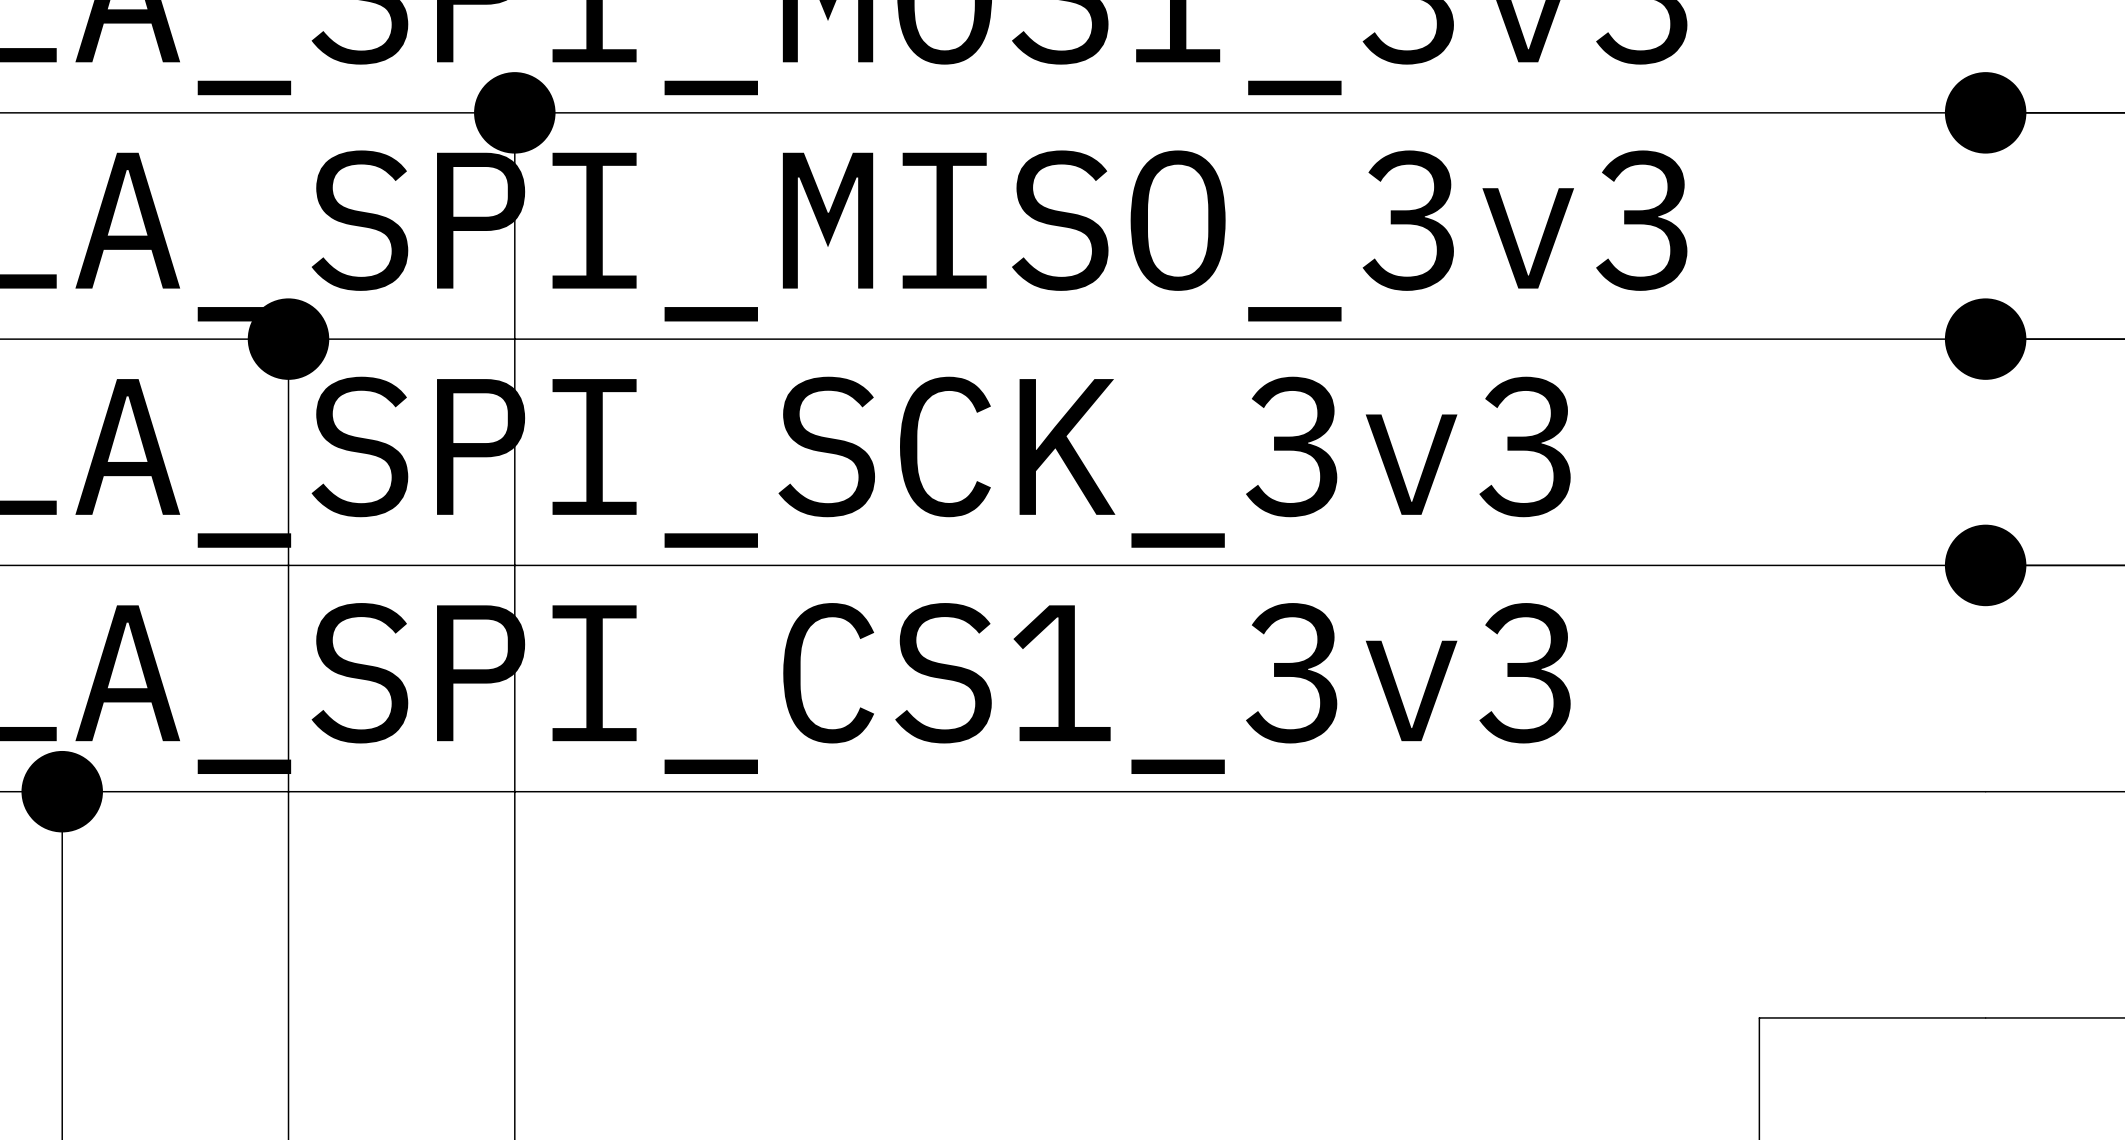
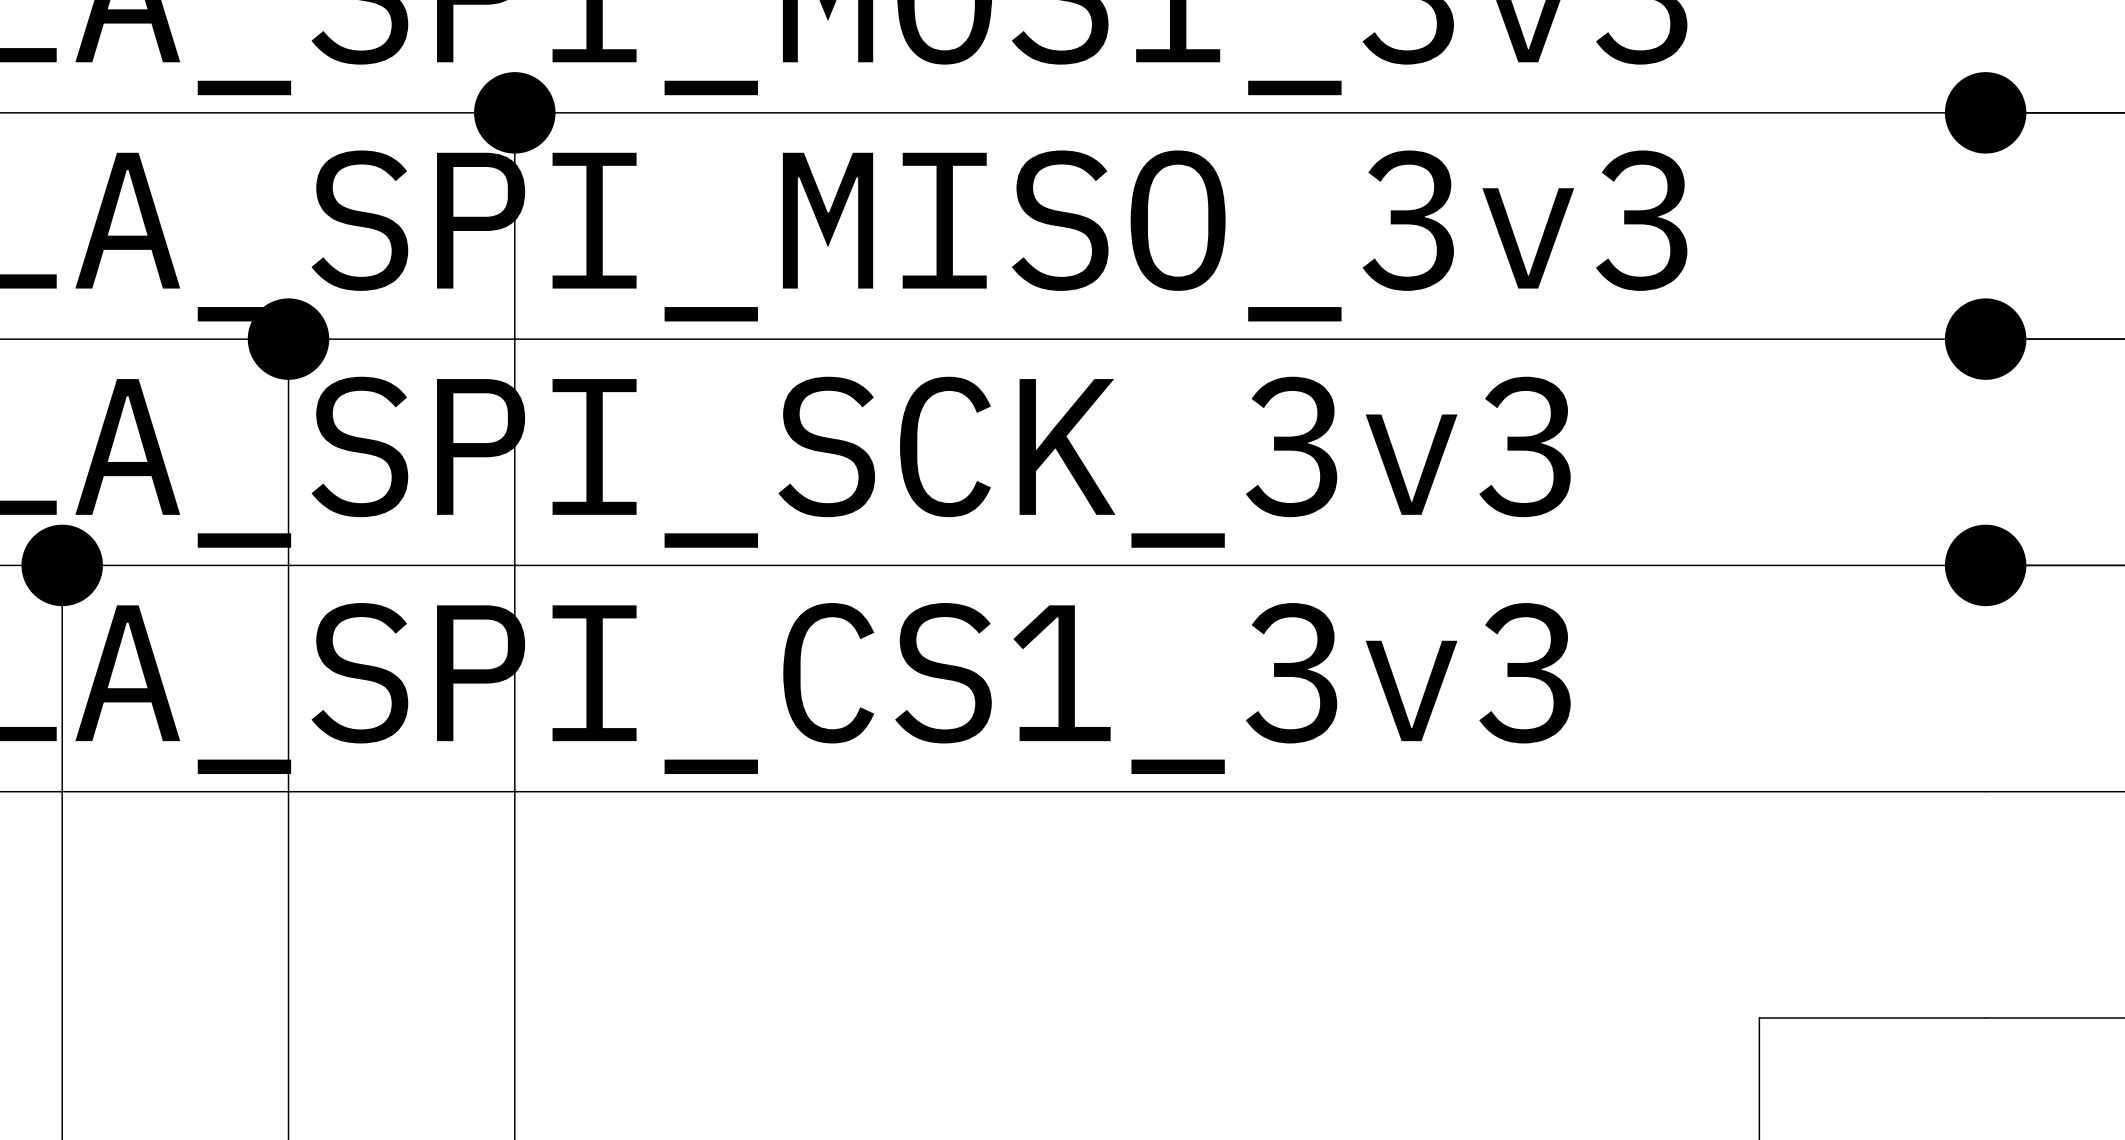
wire: none -> (62, 565) (62, 791)
junction position: (62, 791) -> (62, 565)

